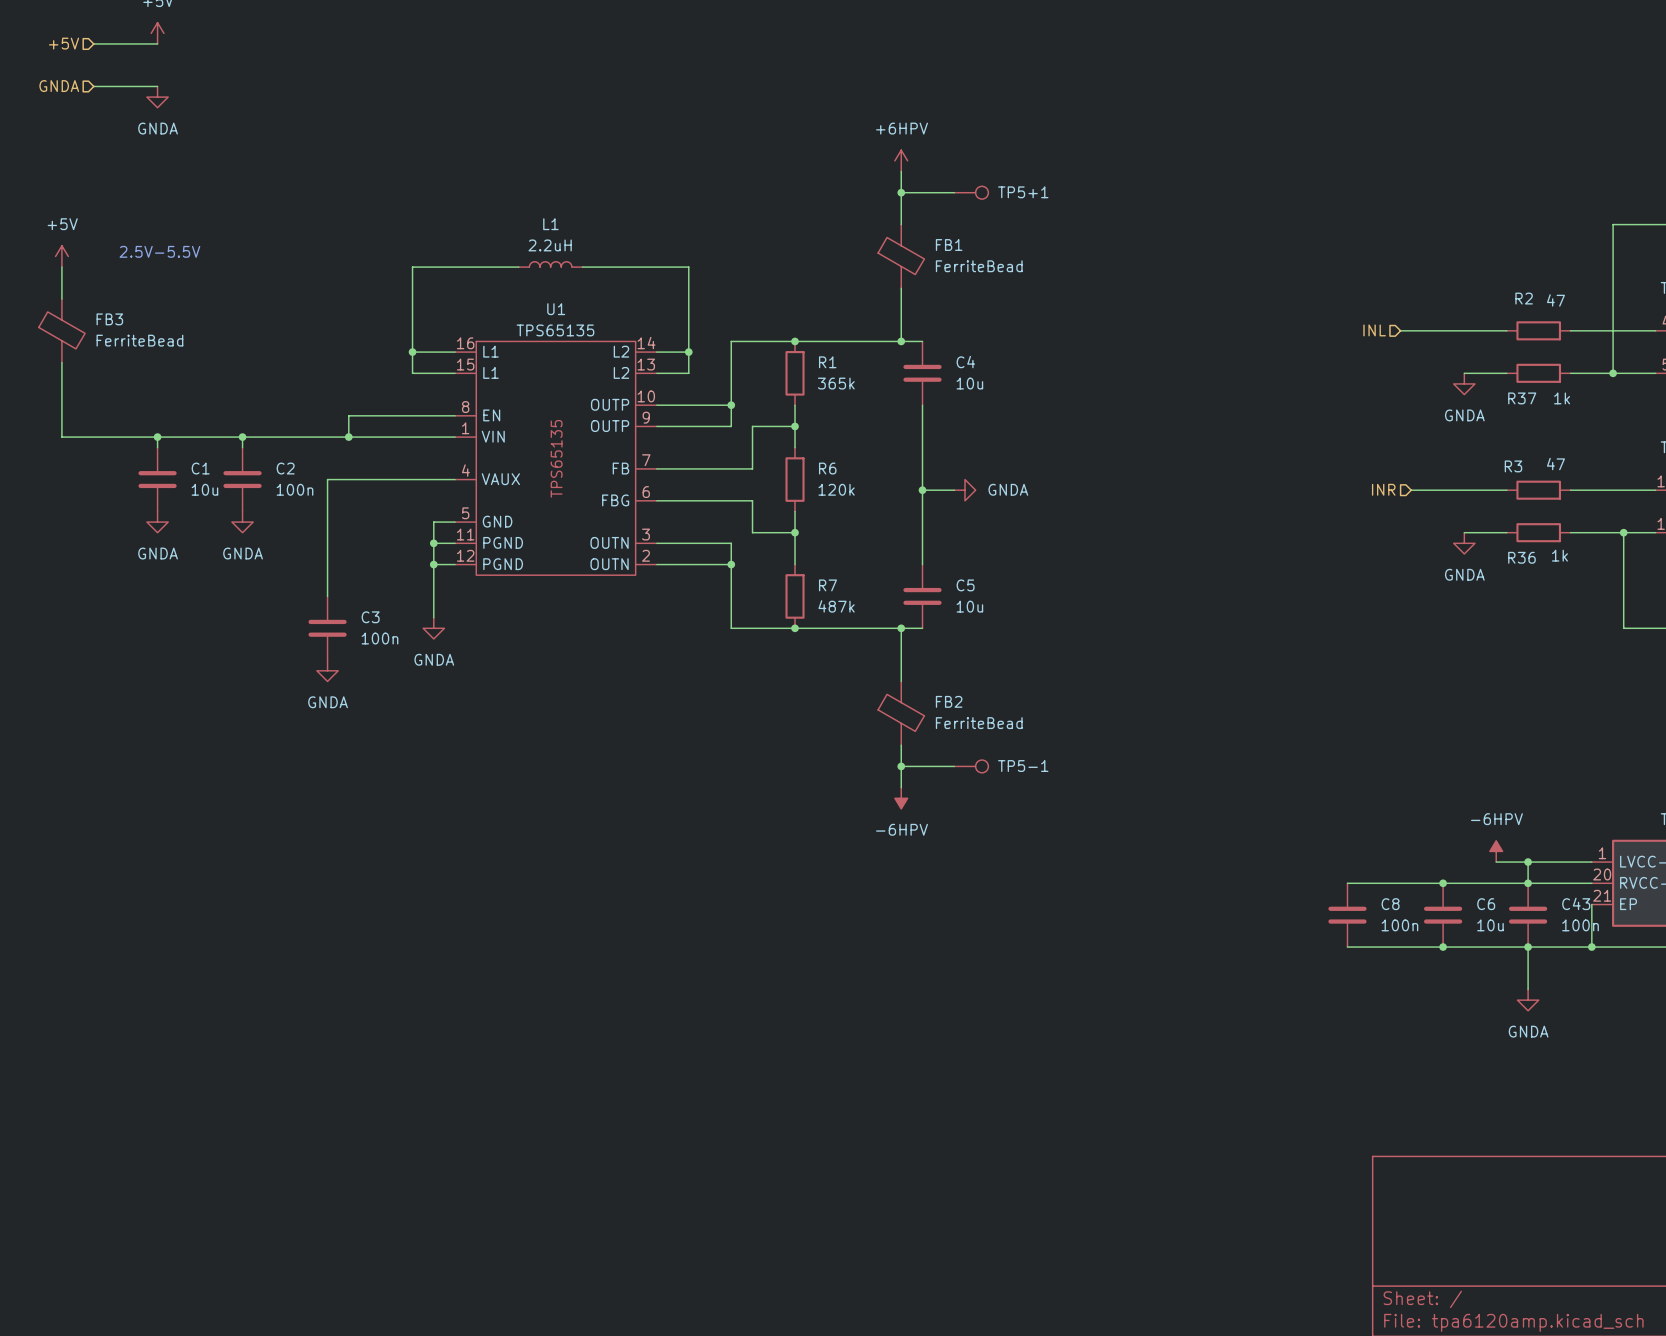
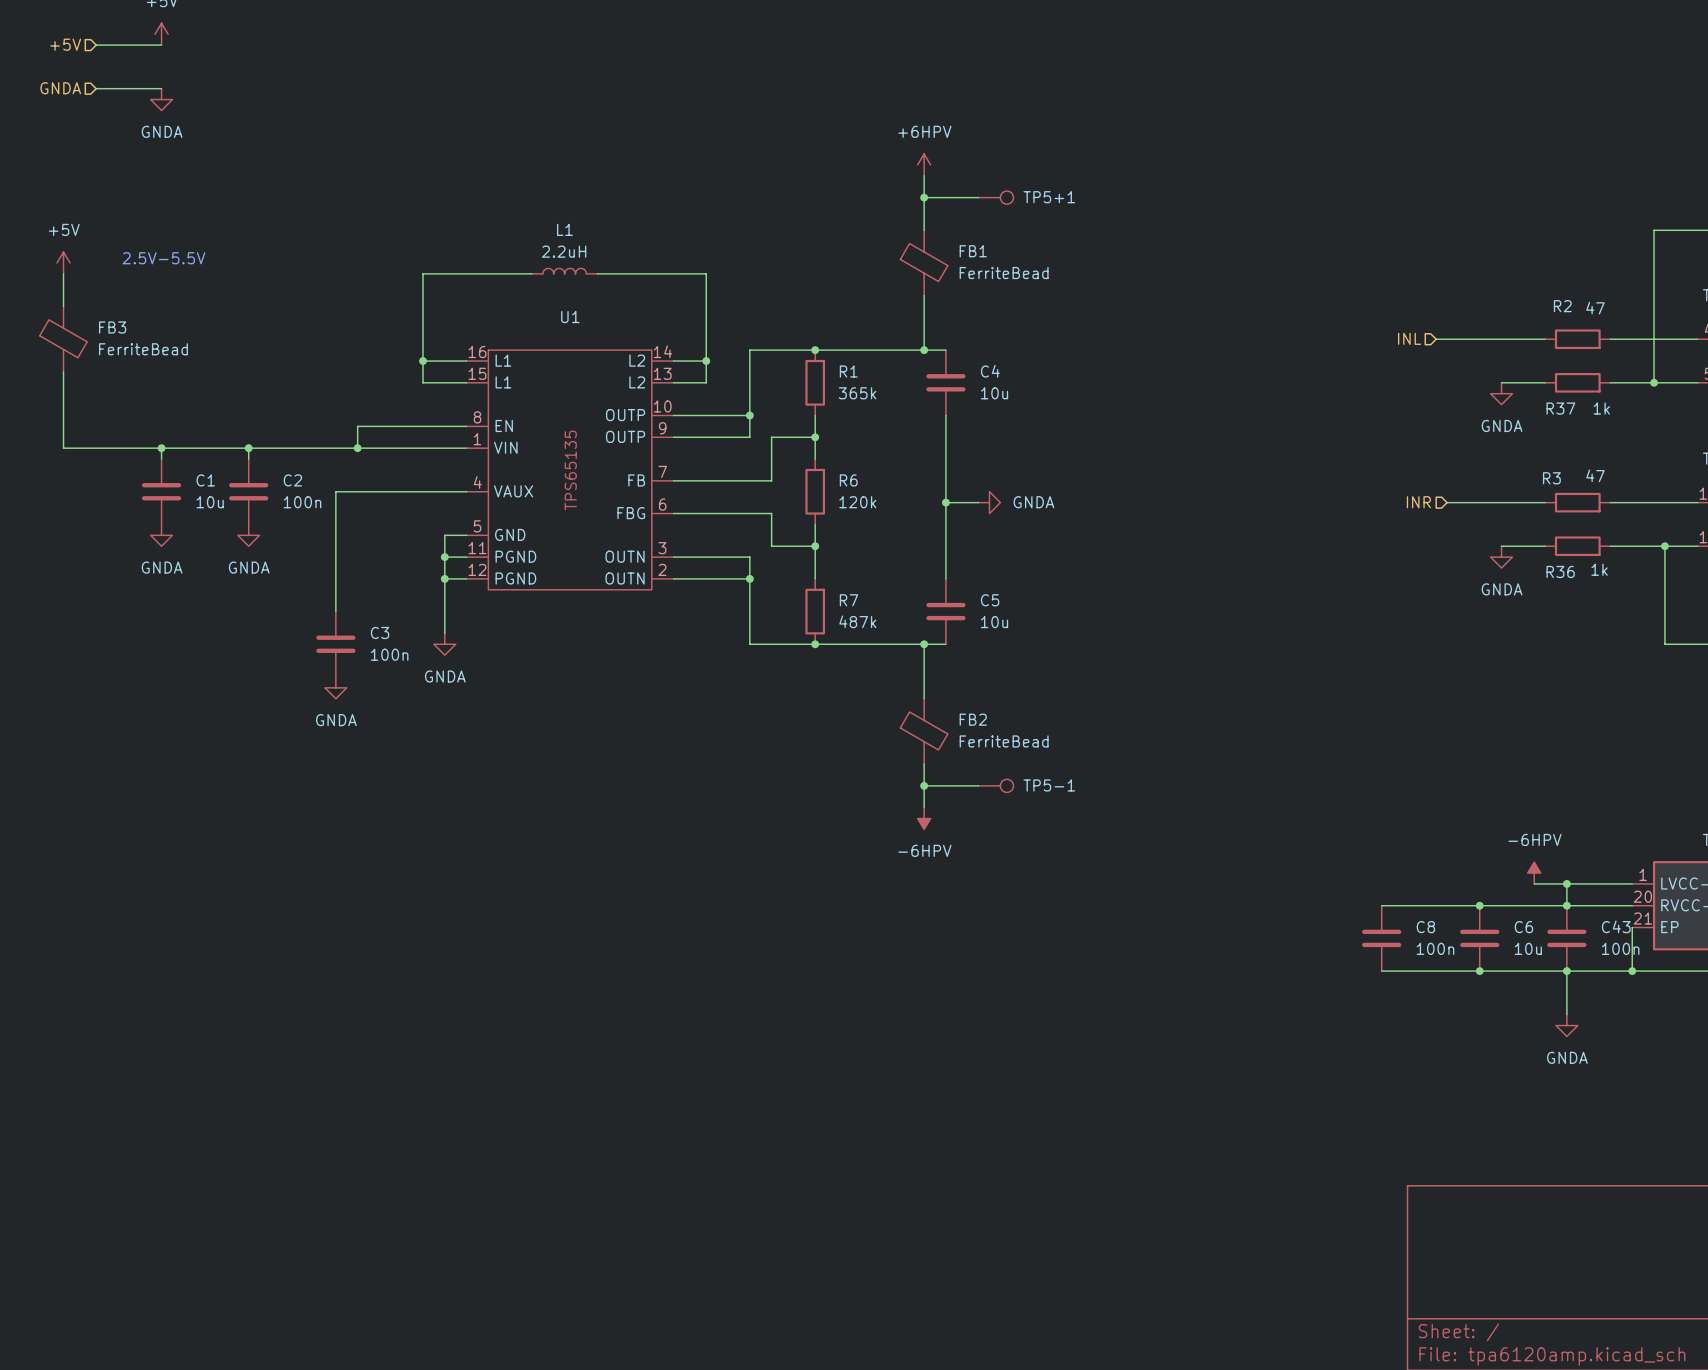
U1 value: TPS65135 (555, 330) -> none

